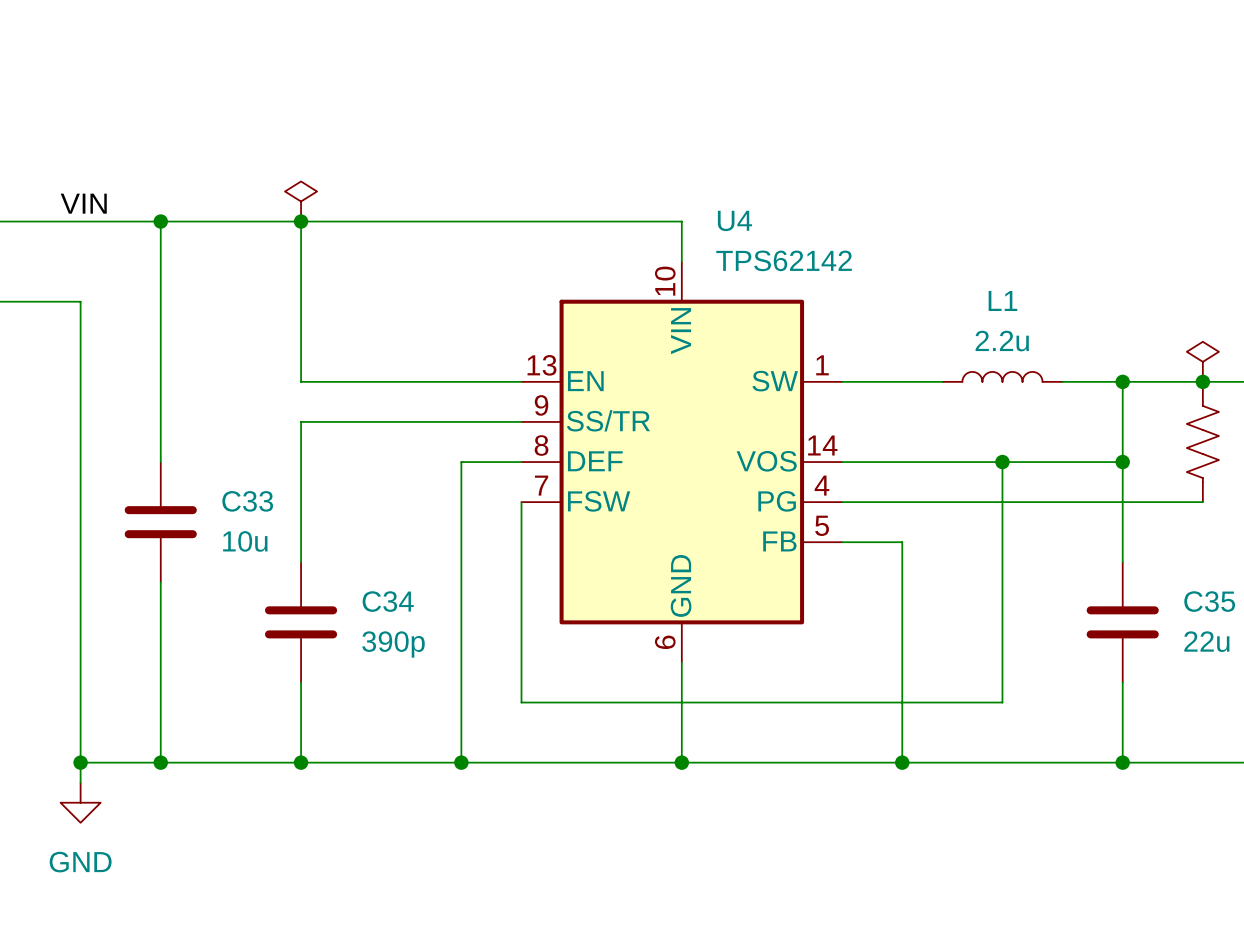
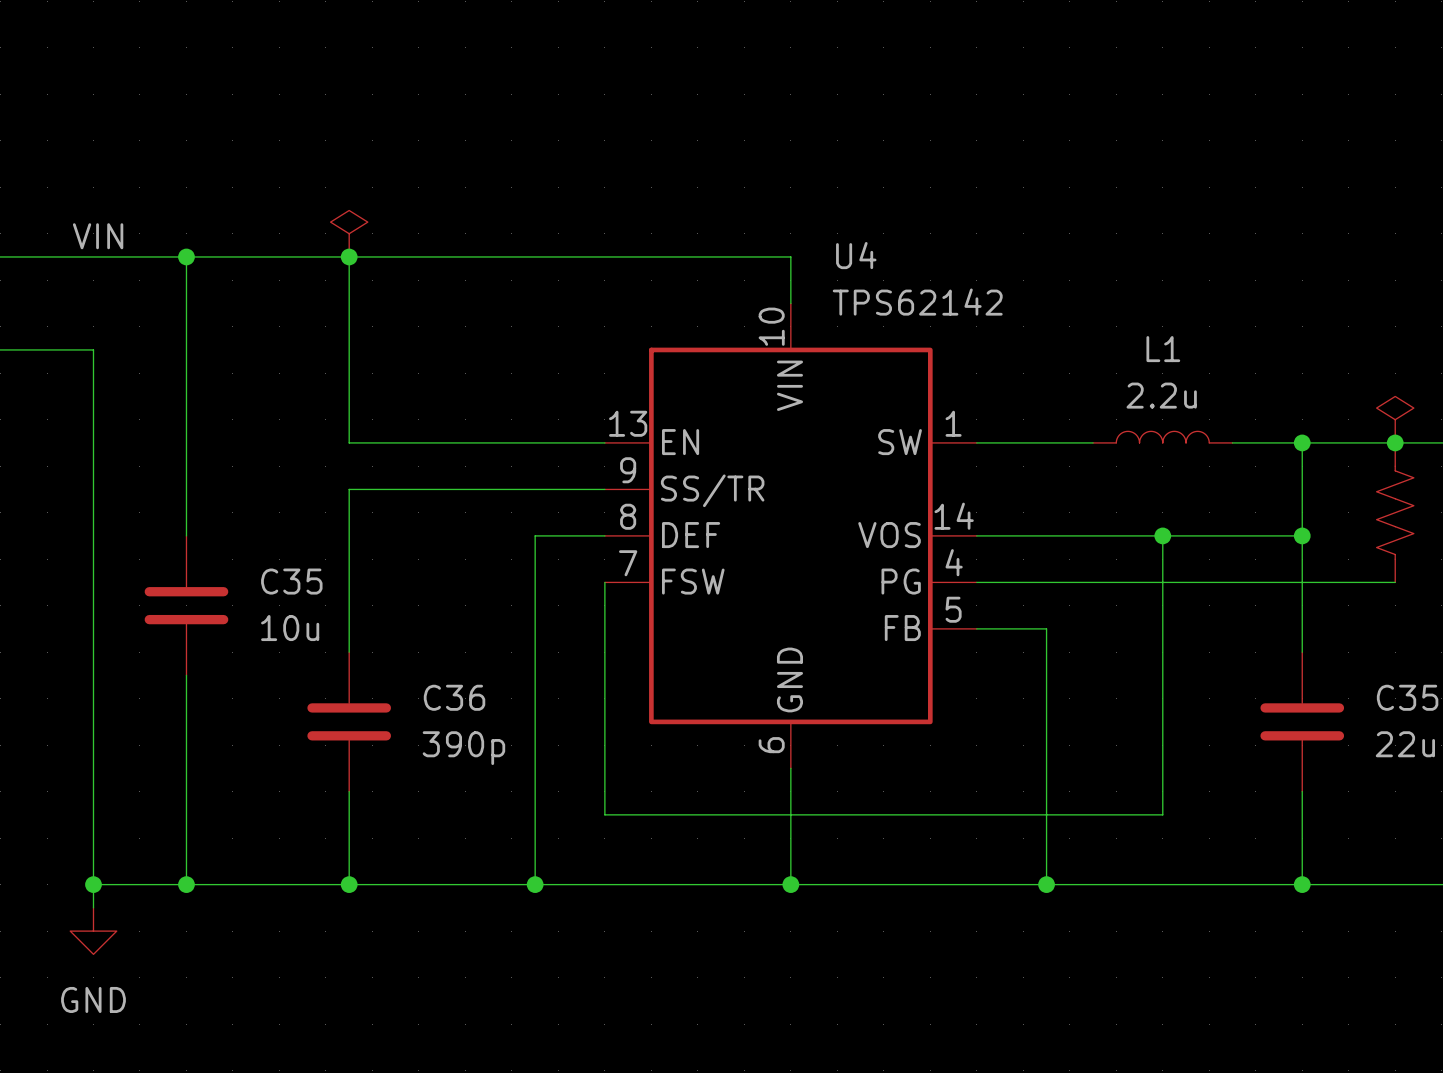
C33 name: C33 (247, 501) -> C35 (291, 581)
C34 name: C34 (388, 601) -> C36 (454, 697)

